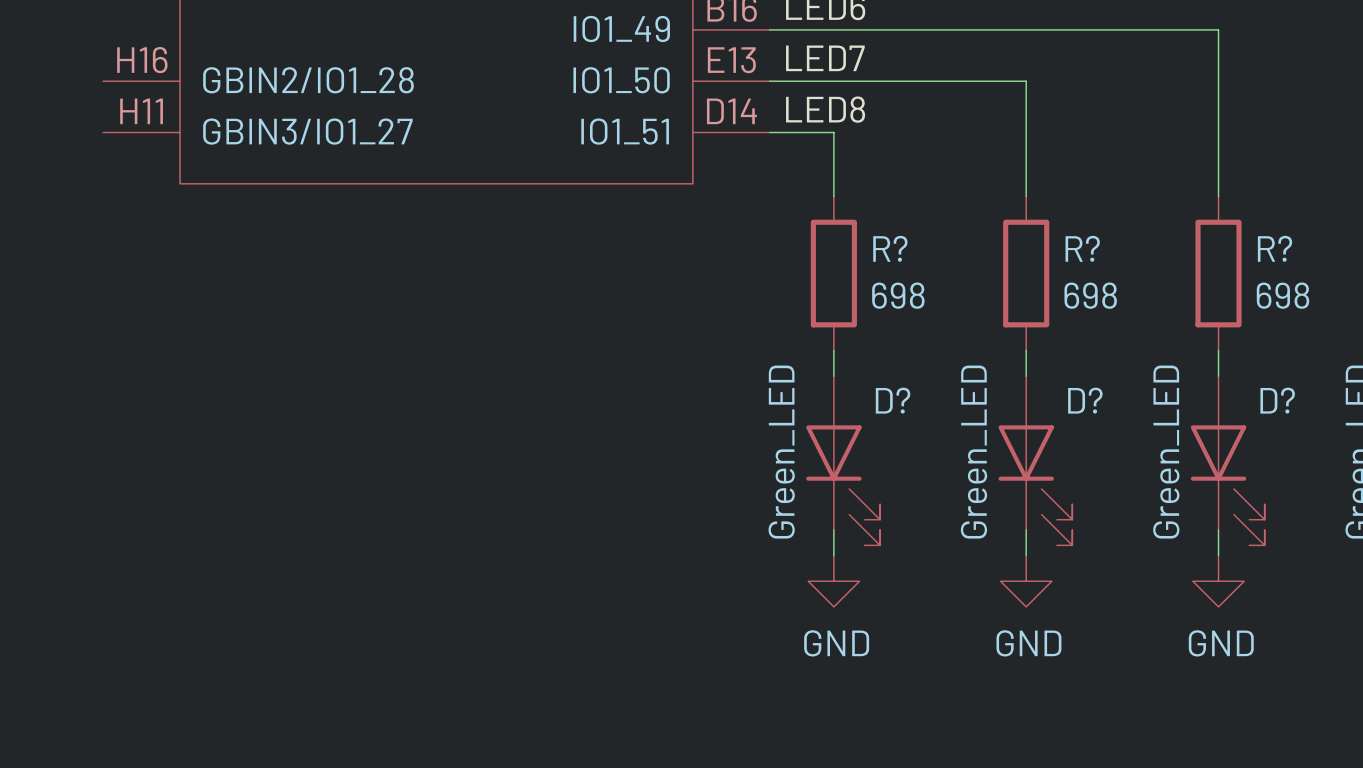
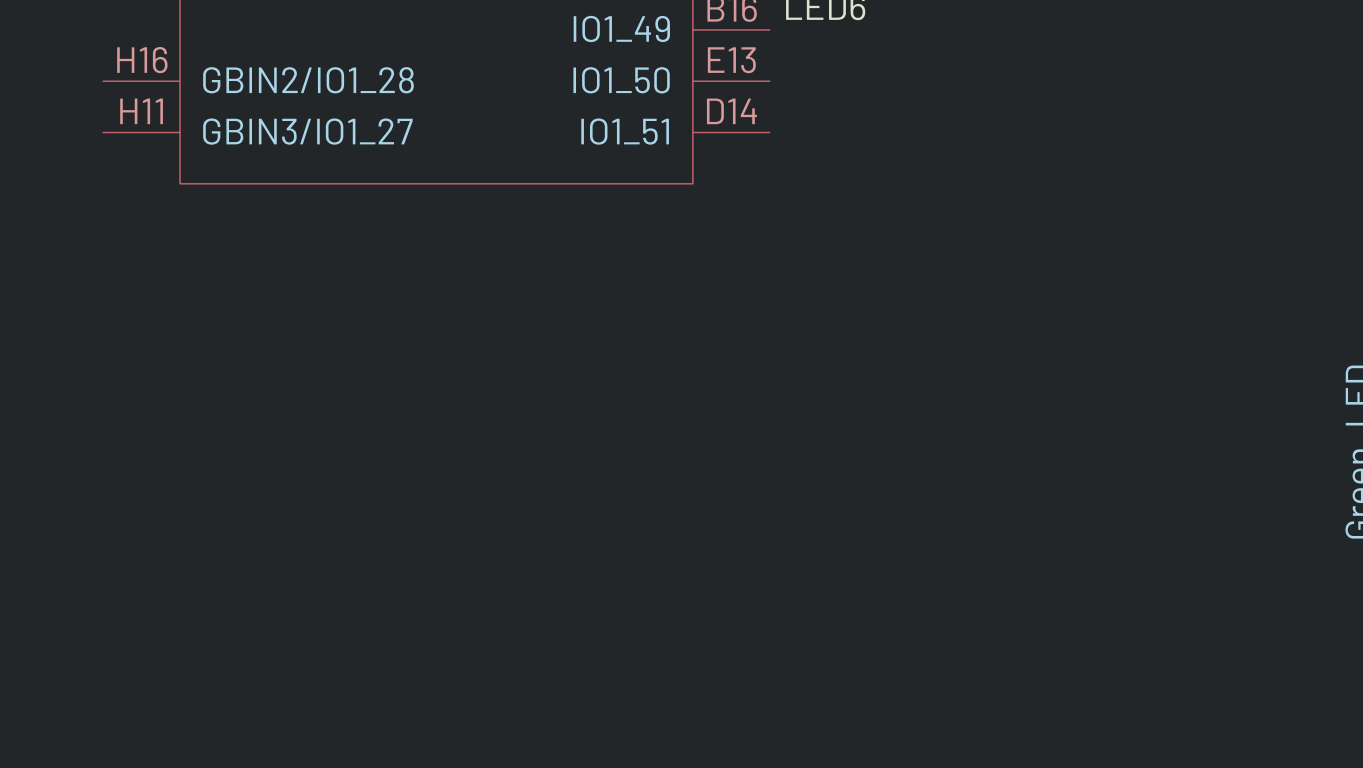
wire: (769, 29) (1218, 29) (1218, 196) -> none
label: LED7 (825, 58) -> none
wire: (769, 81) (1026, 81) (1026, 196) -> none
label: LED8 (825, 109) -> none
wire: (769, 132) (833, 132) (833, 196) -> none
R?: (833, 273) -> none
R?: (1026, 273) -> none
R?: (1218, 273) -> none
wire: (833, 350) (833, 376) -> none
wire: (1026, 350) (1026, 376) -> none
wire: (1218, 350) (1218, 376) -> none
D?: Green_LED (843, 460) -> none
D?: Green_LED (1035, 460) -> none
D?: Green_LED (1227, 460) -> none
wire: (833, 529) (833, 555) -> none
wire: (1026, 529) (1026, 555) -> none
wire: (1218, 529) (1218, 555) -> none
power symbol: GND (833, 581) -> none
power symbol: GND (1026, 581) -> none
power symbol: GND (1218, 581) -> none

